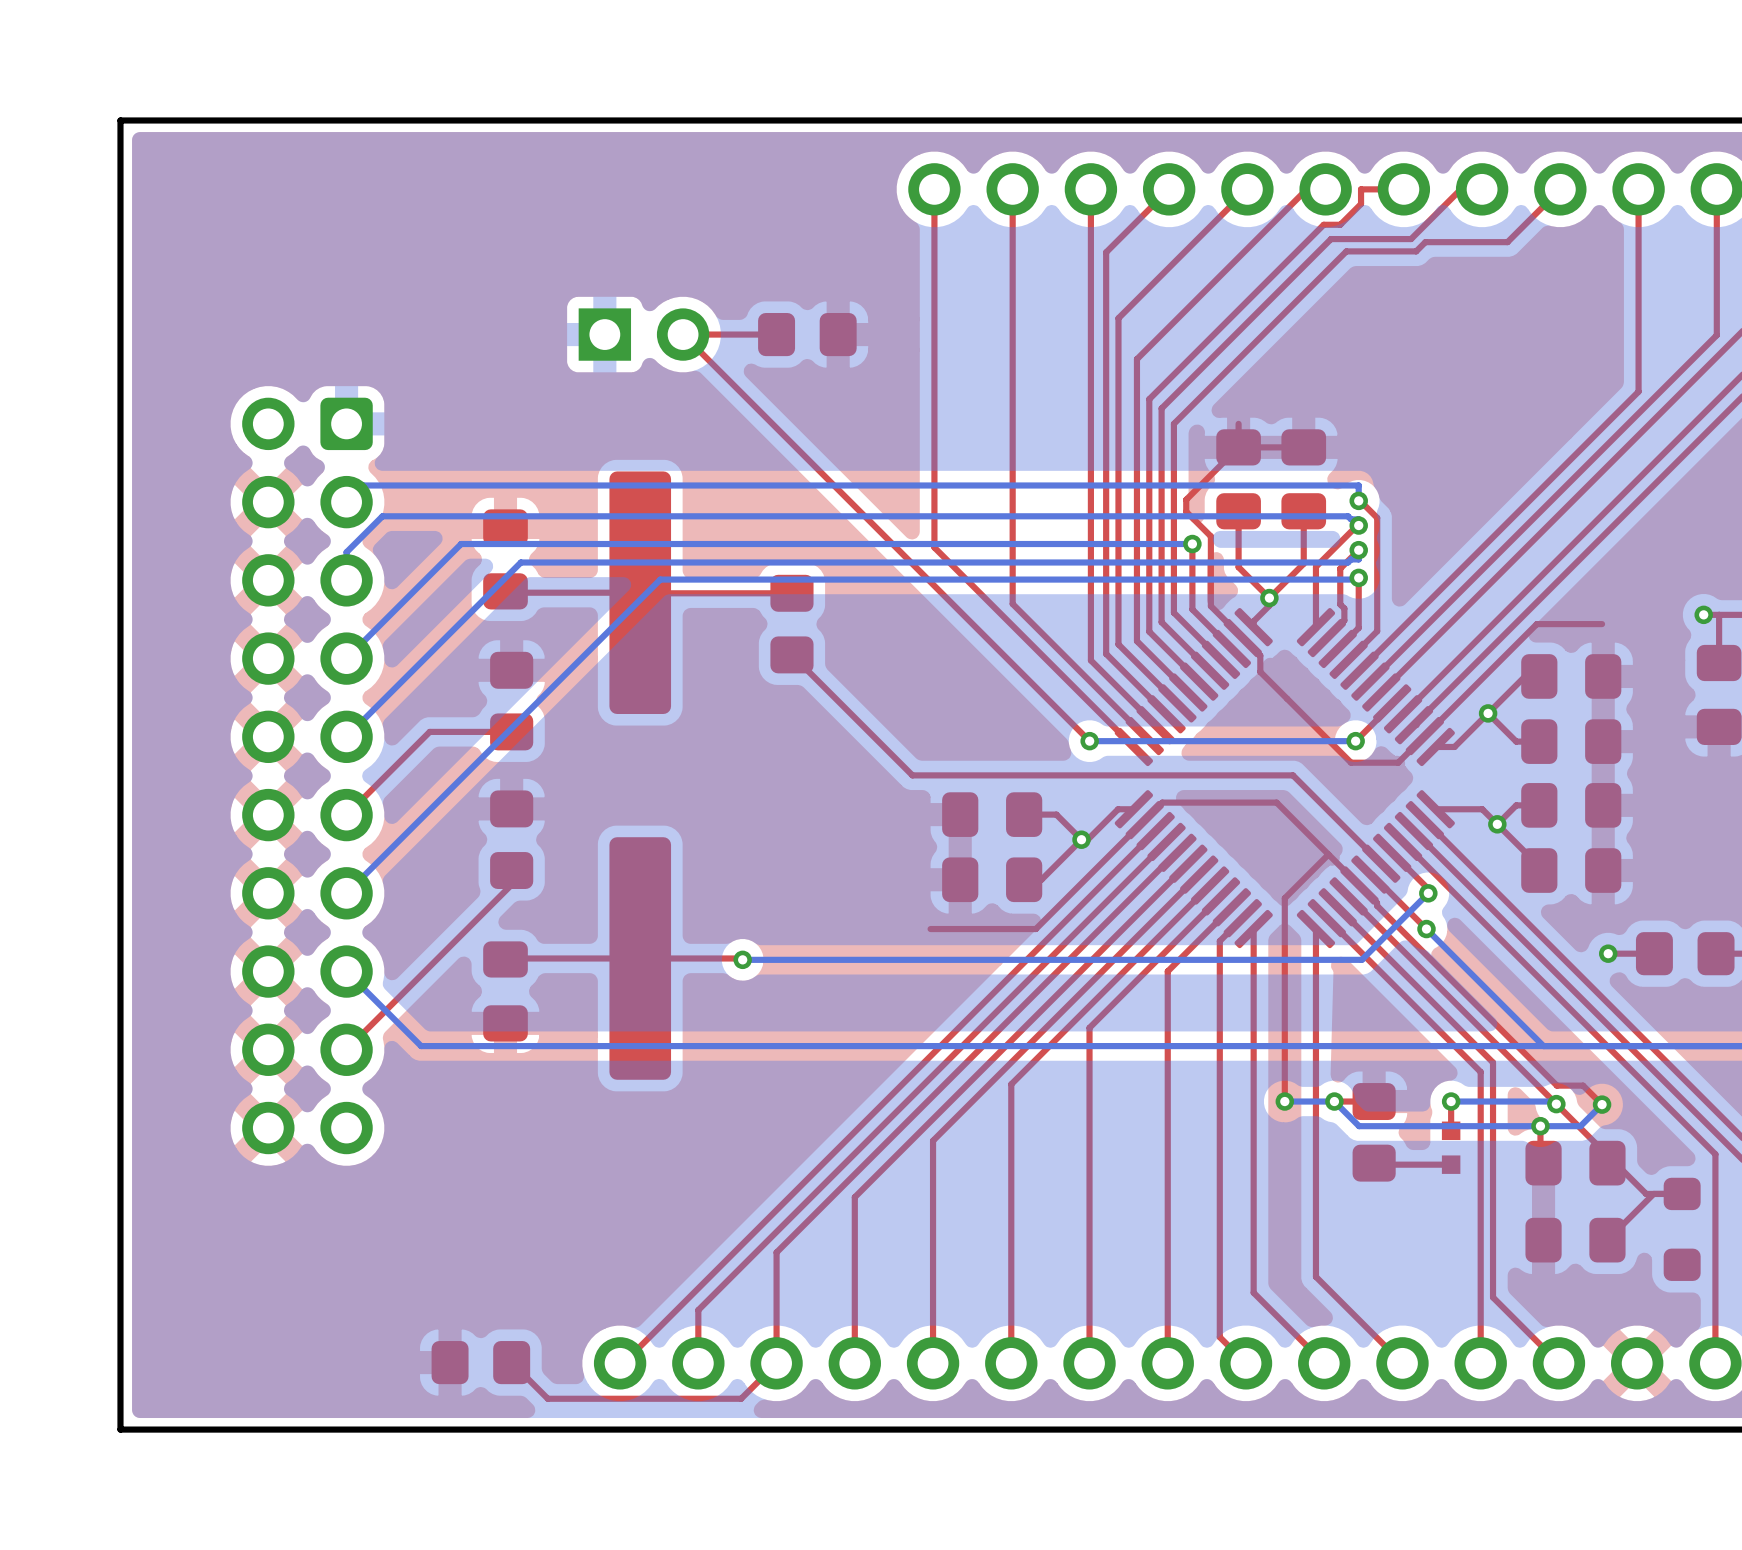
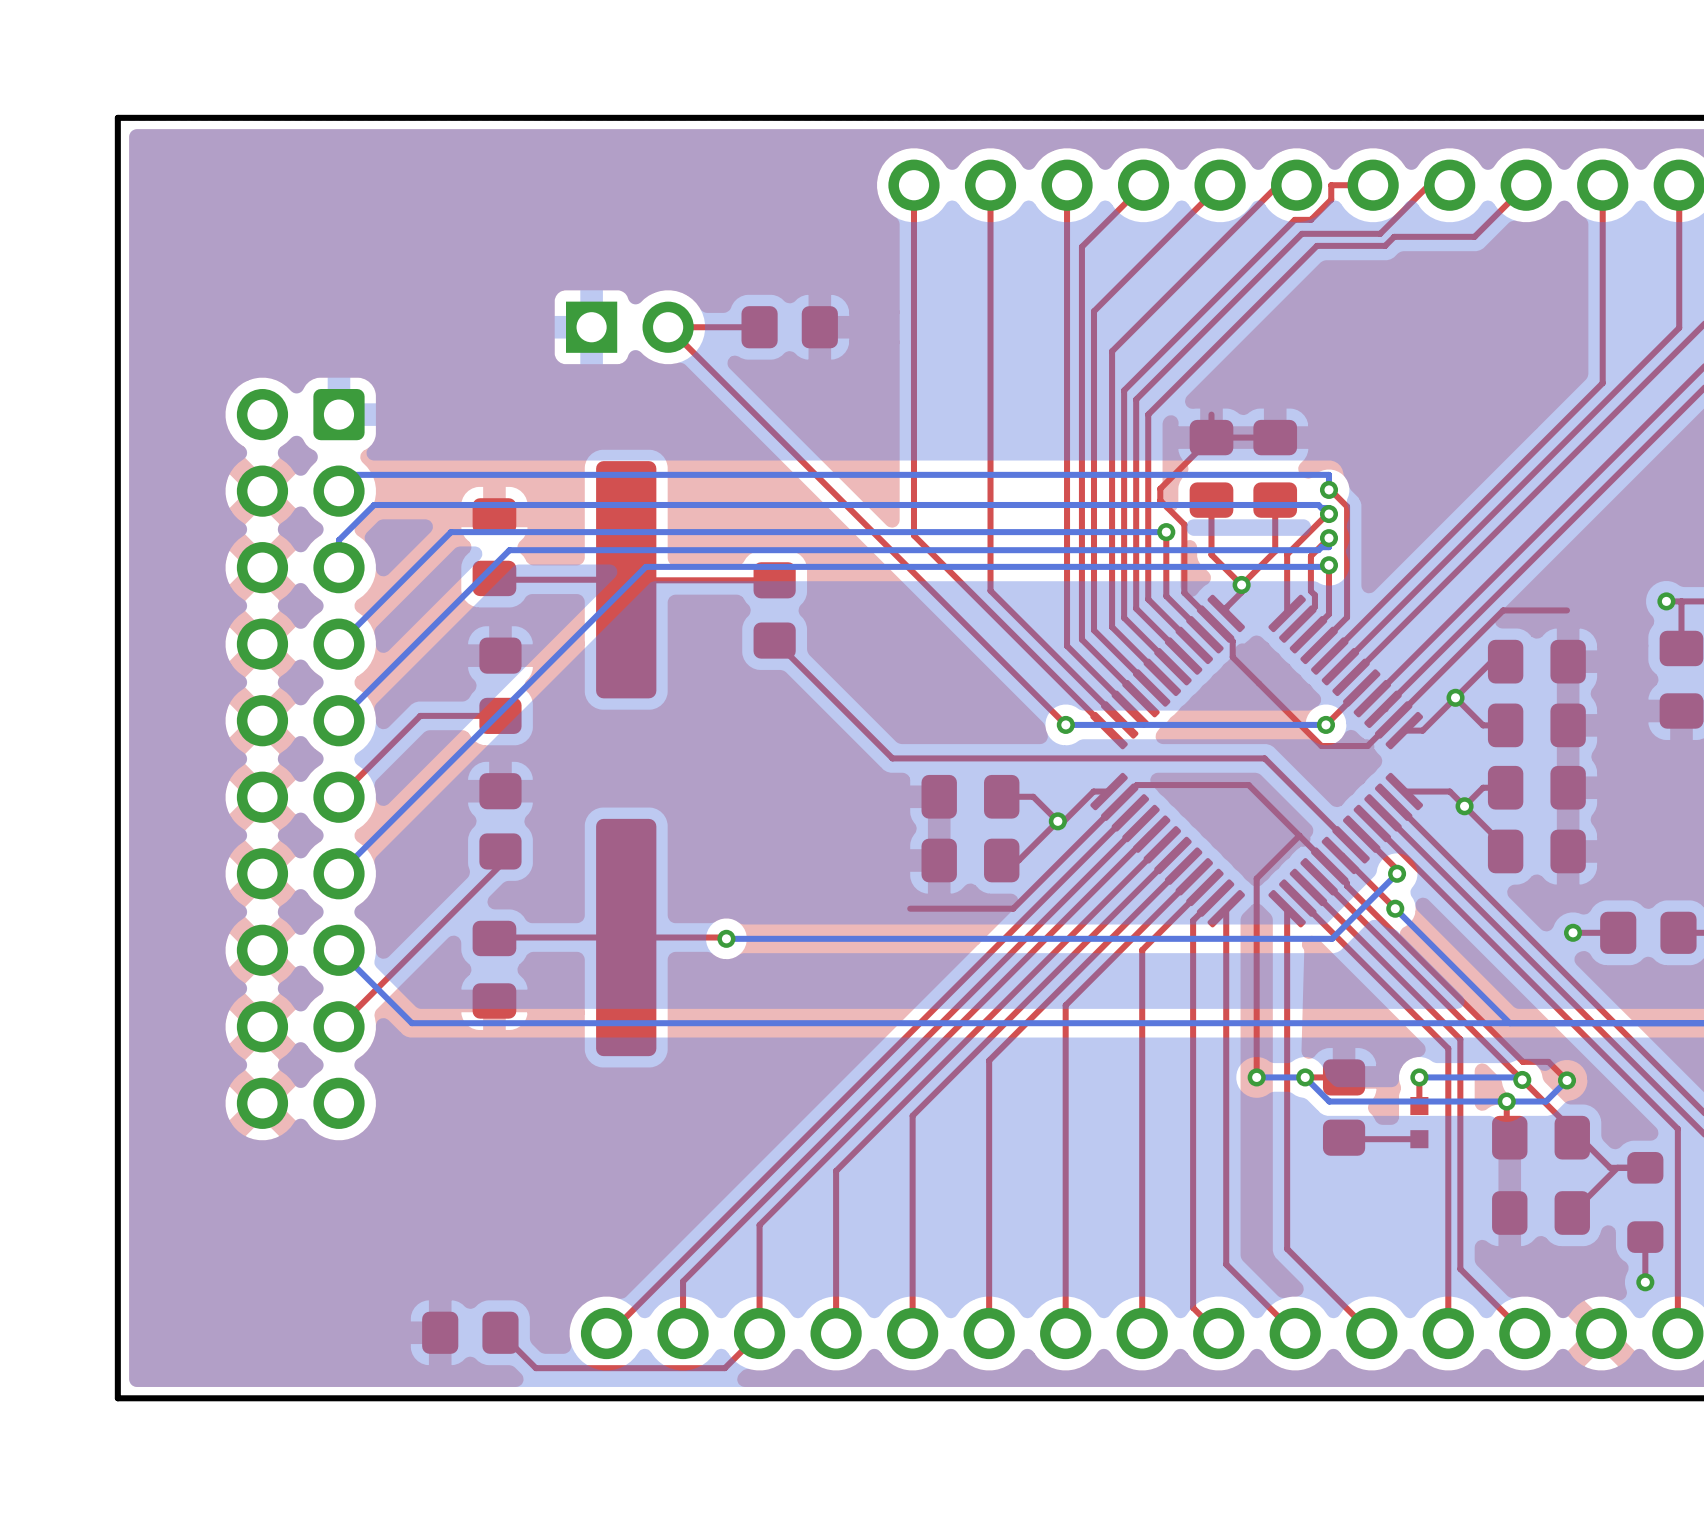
top track: none -> (1645, 1237) (1645, 1282)
via: none -> (1645, 1282)

